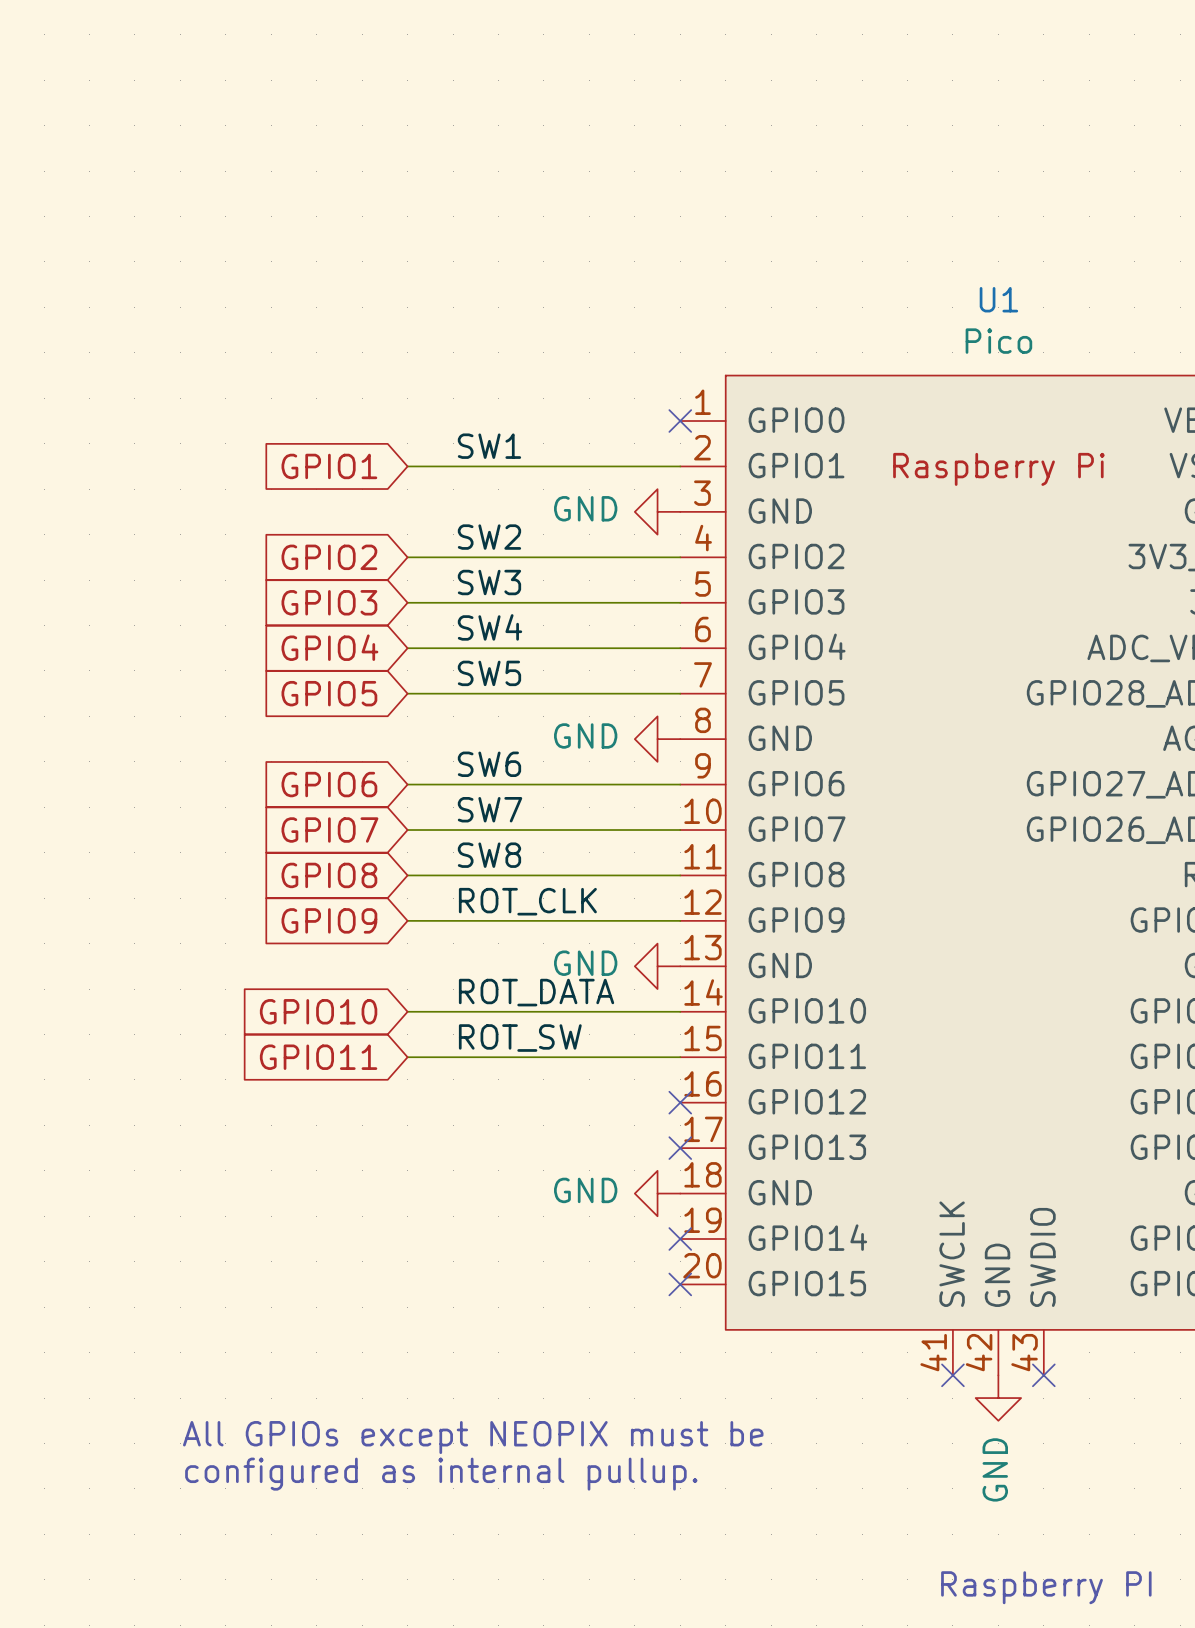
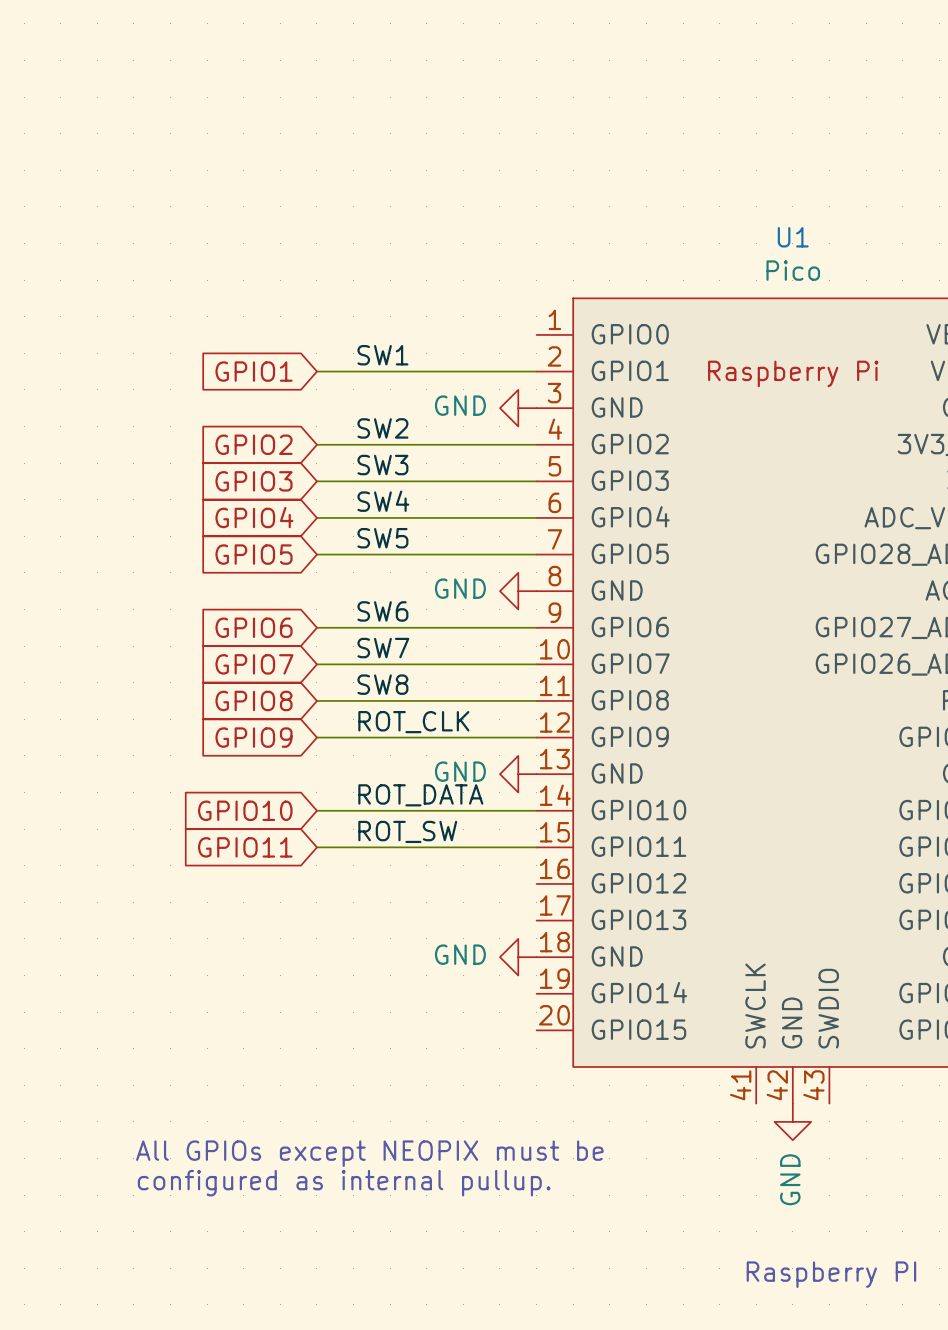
no-connect mark: (680, 421) -> none
no-connect mark: (680, 1102) -> none
no-connect mark: (680, 1148) -> none
no-connect mark: (680, 1239) -> none
no-connect mark: (680, 1284) -> none
no-connect mark: (952, 1375) -> none
no-connect mark: (1043, 1375) -> none

